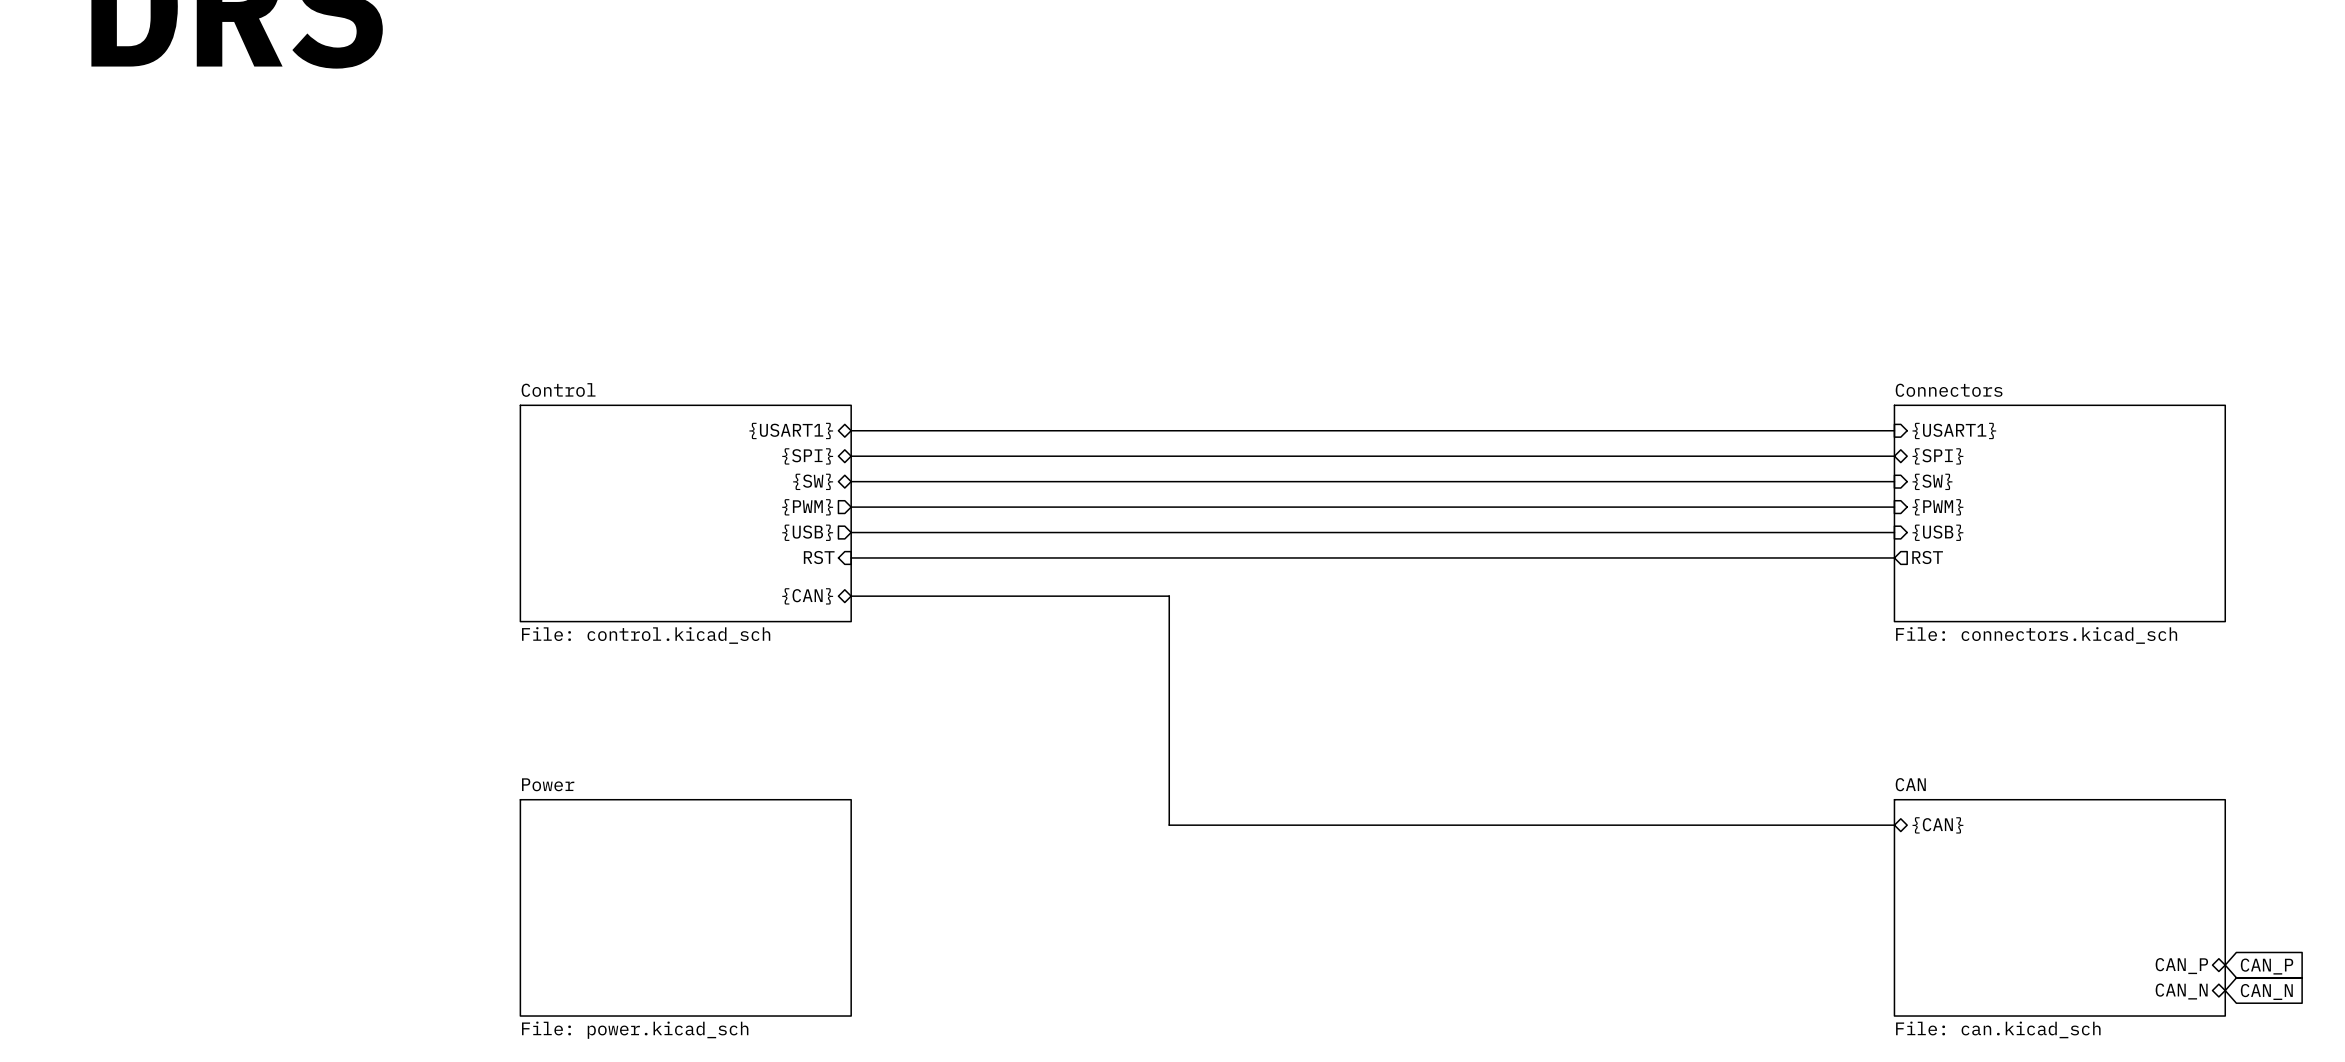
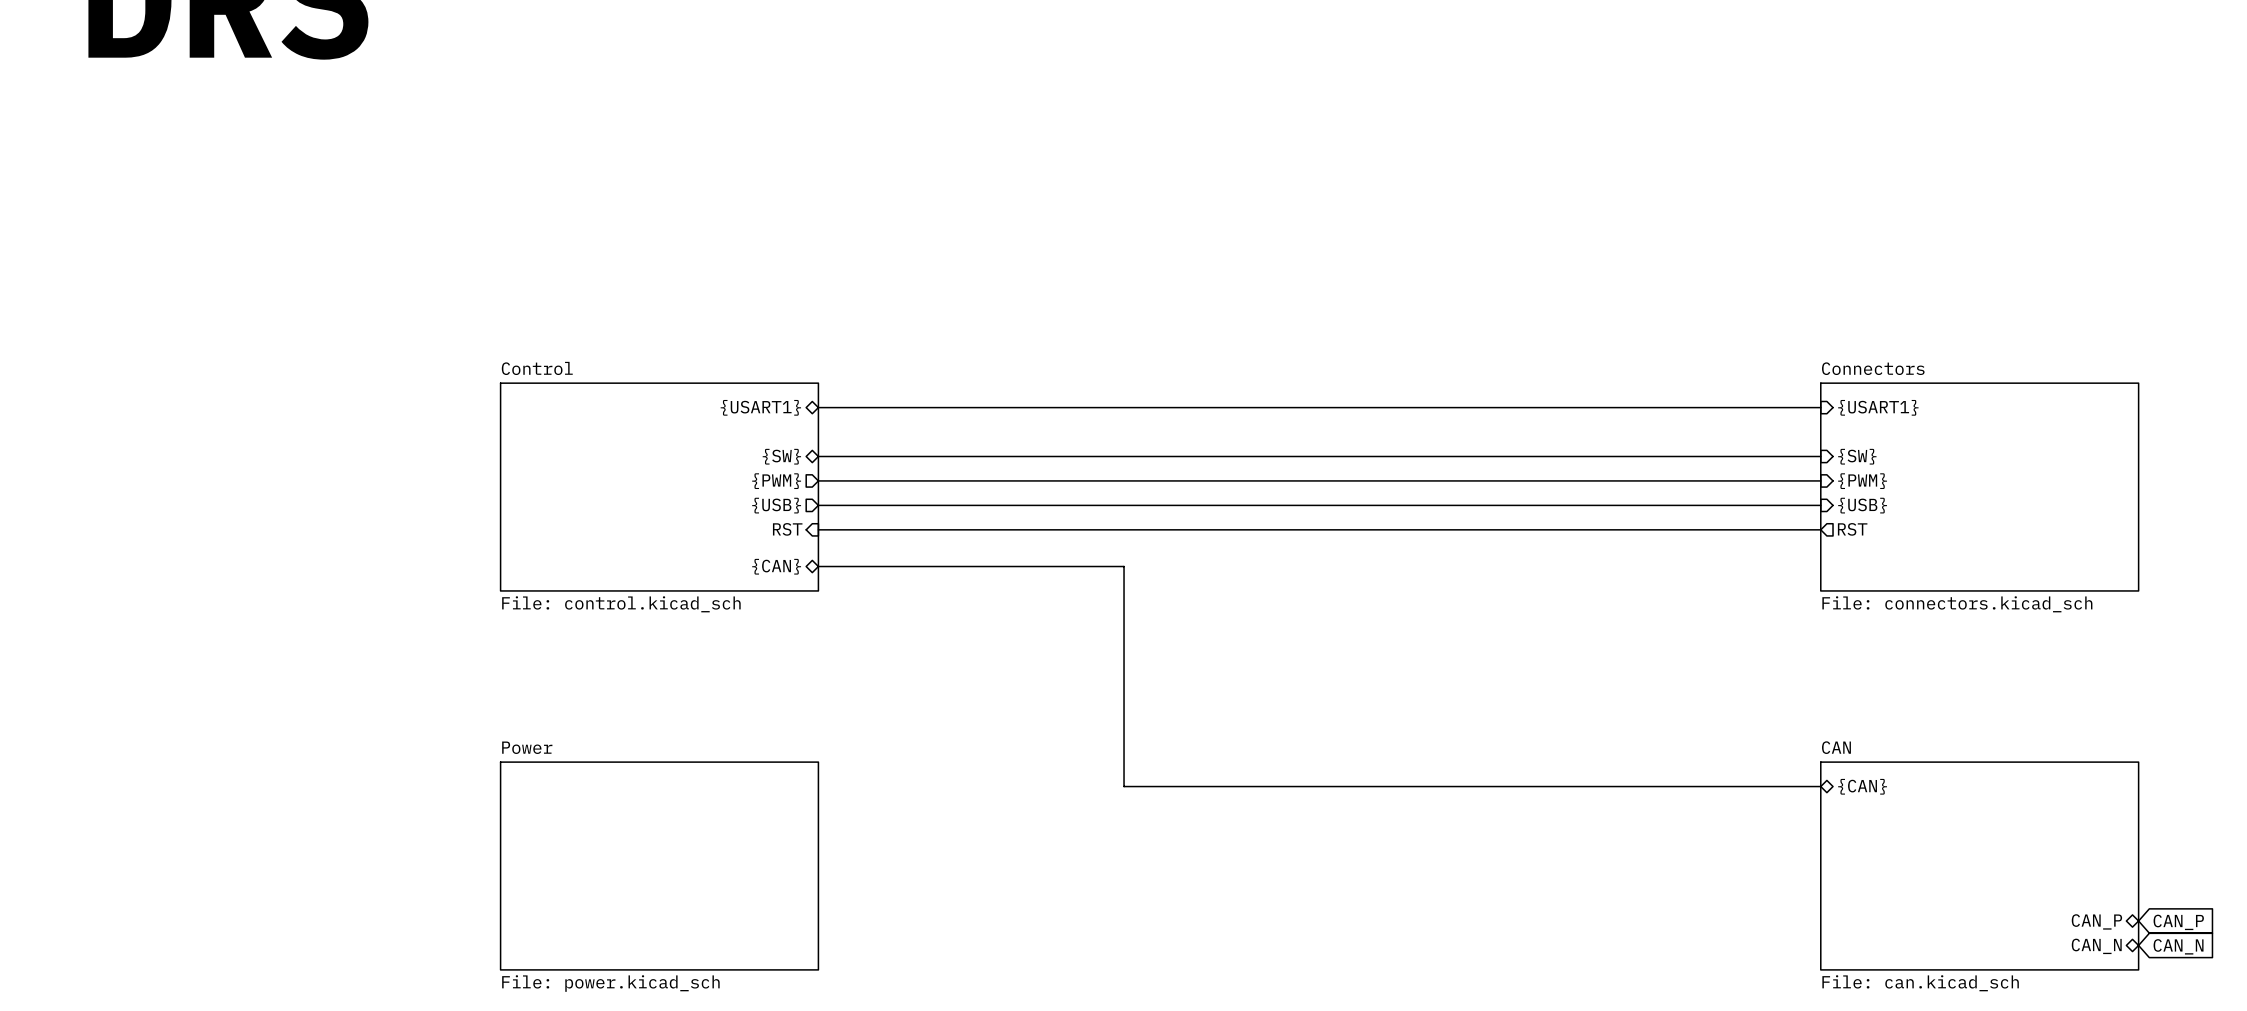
sheet pin: {SPI} (807, 456) -> none
bus: (851, 456) (1894, 456) -> none
sheet pin: {SPI} (1937, 456) -> none

